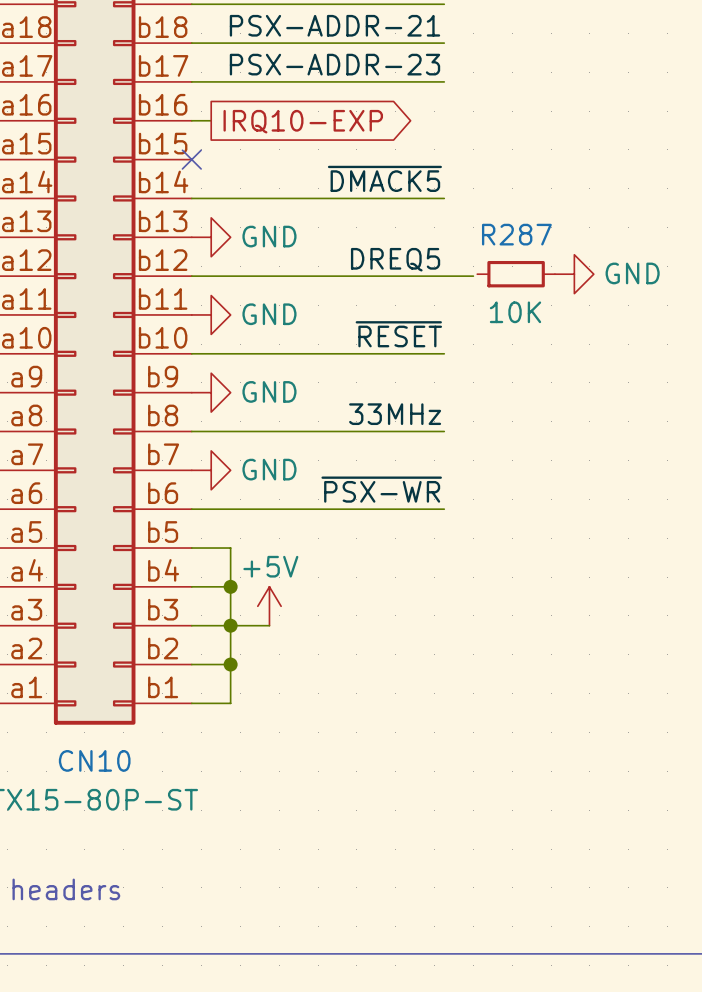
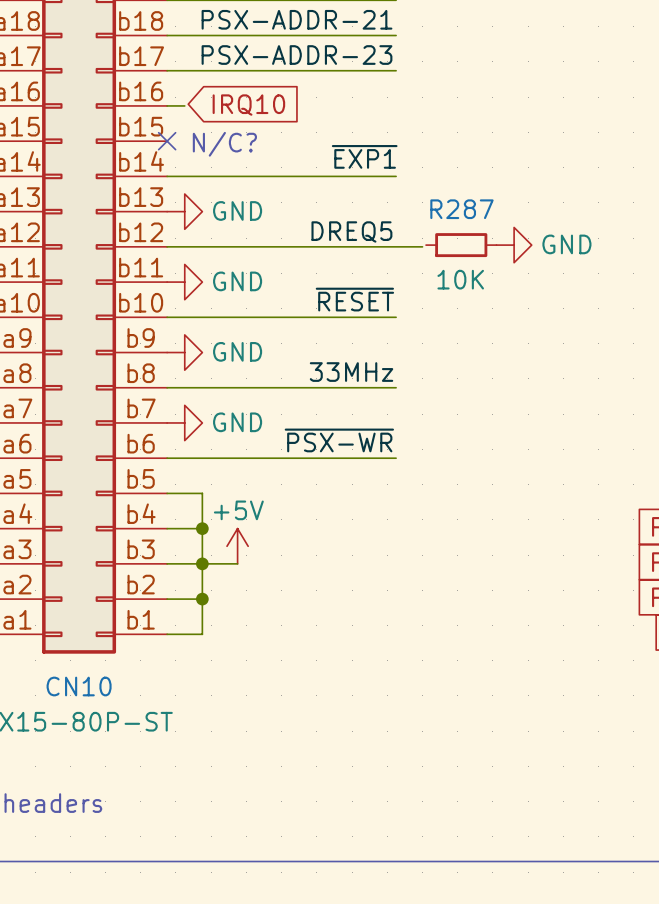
global label shape: output (303, 121) -> input (248, 105)
global label: IRQ10-EXP (303, 121) -> IRQ10 (248, 105)
text: none -> N/C? (224, 144)
label: ~{DMACK5} (384, 178) -> ~{EXP1} (364, 156)

